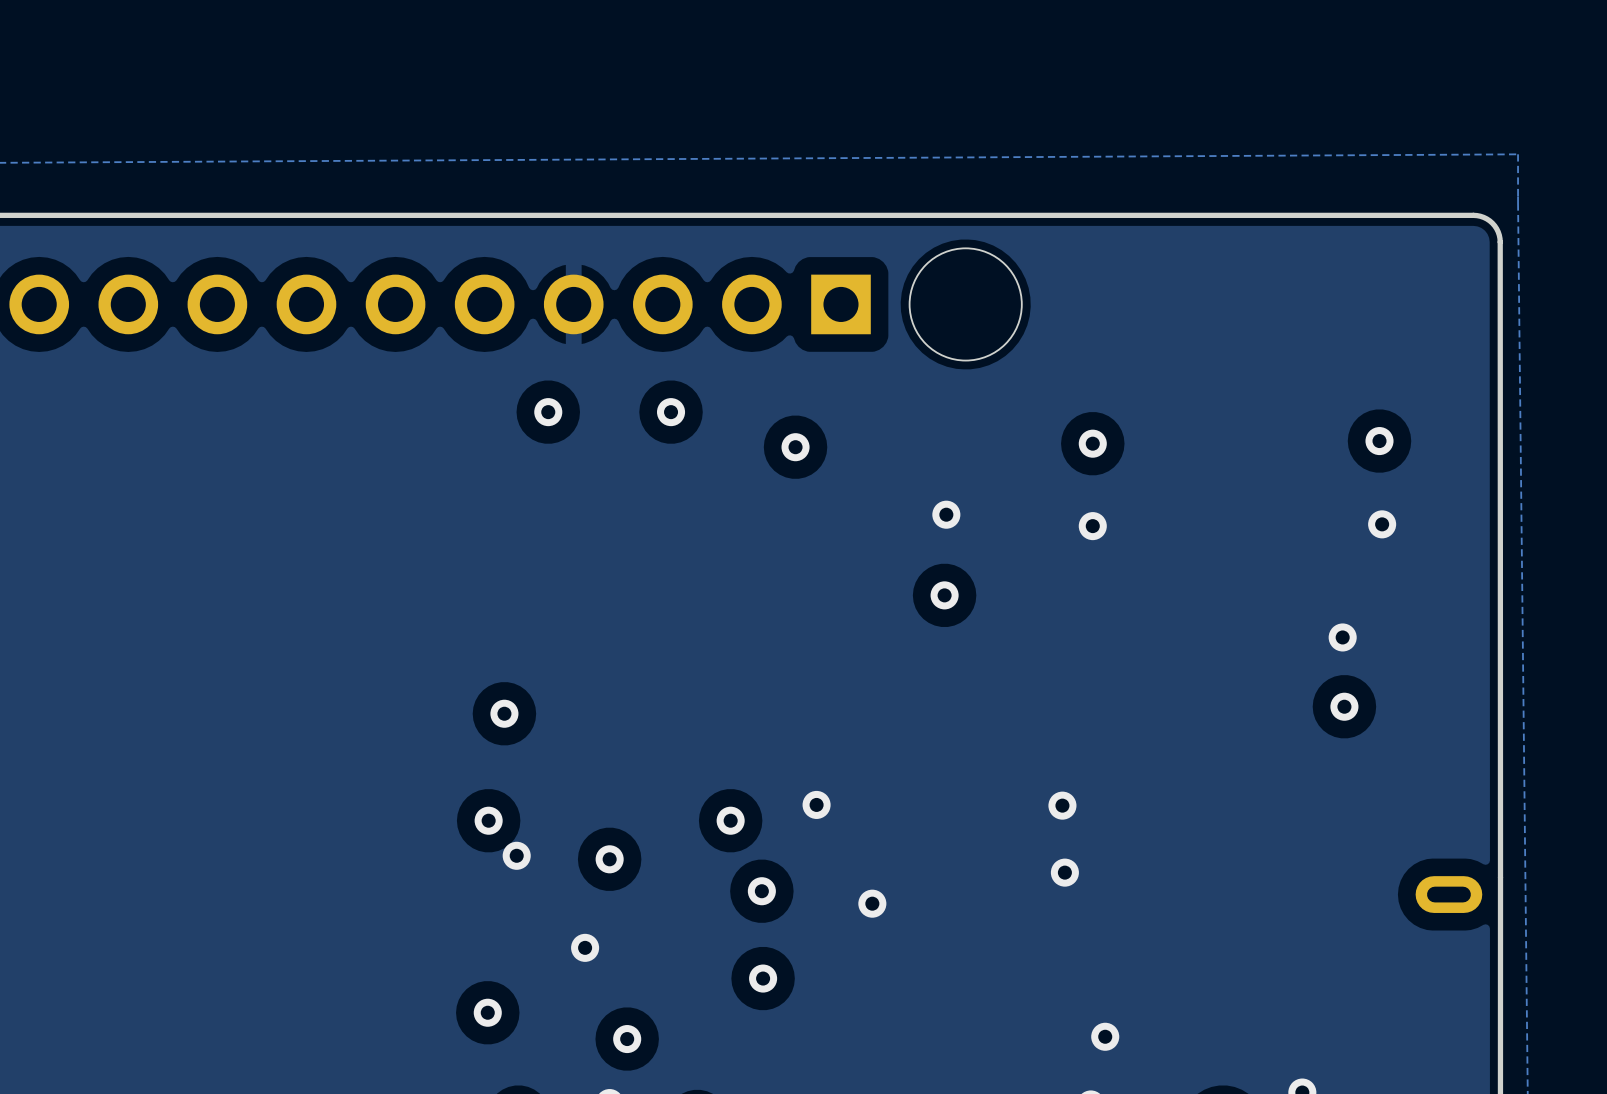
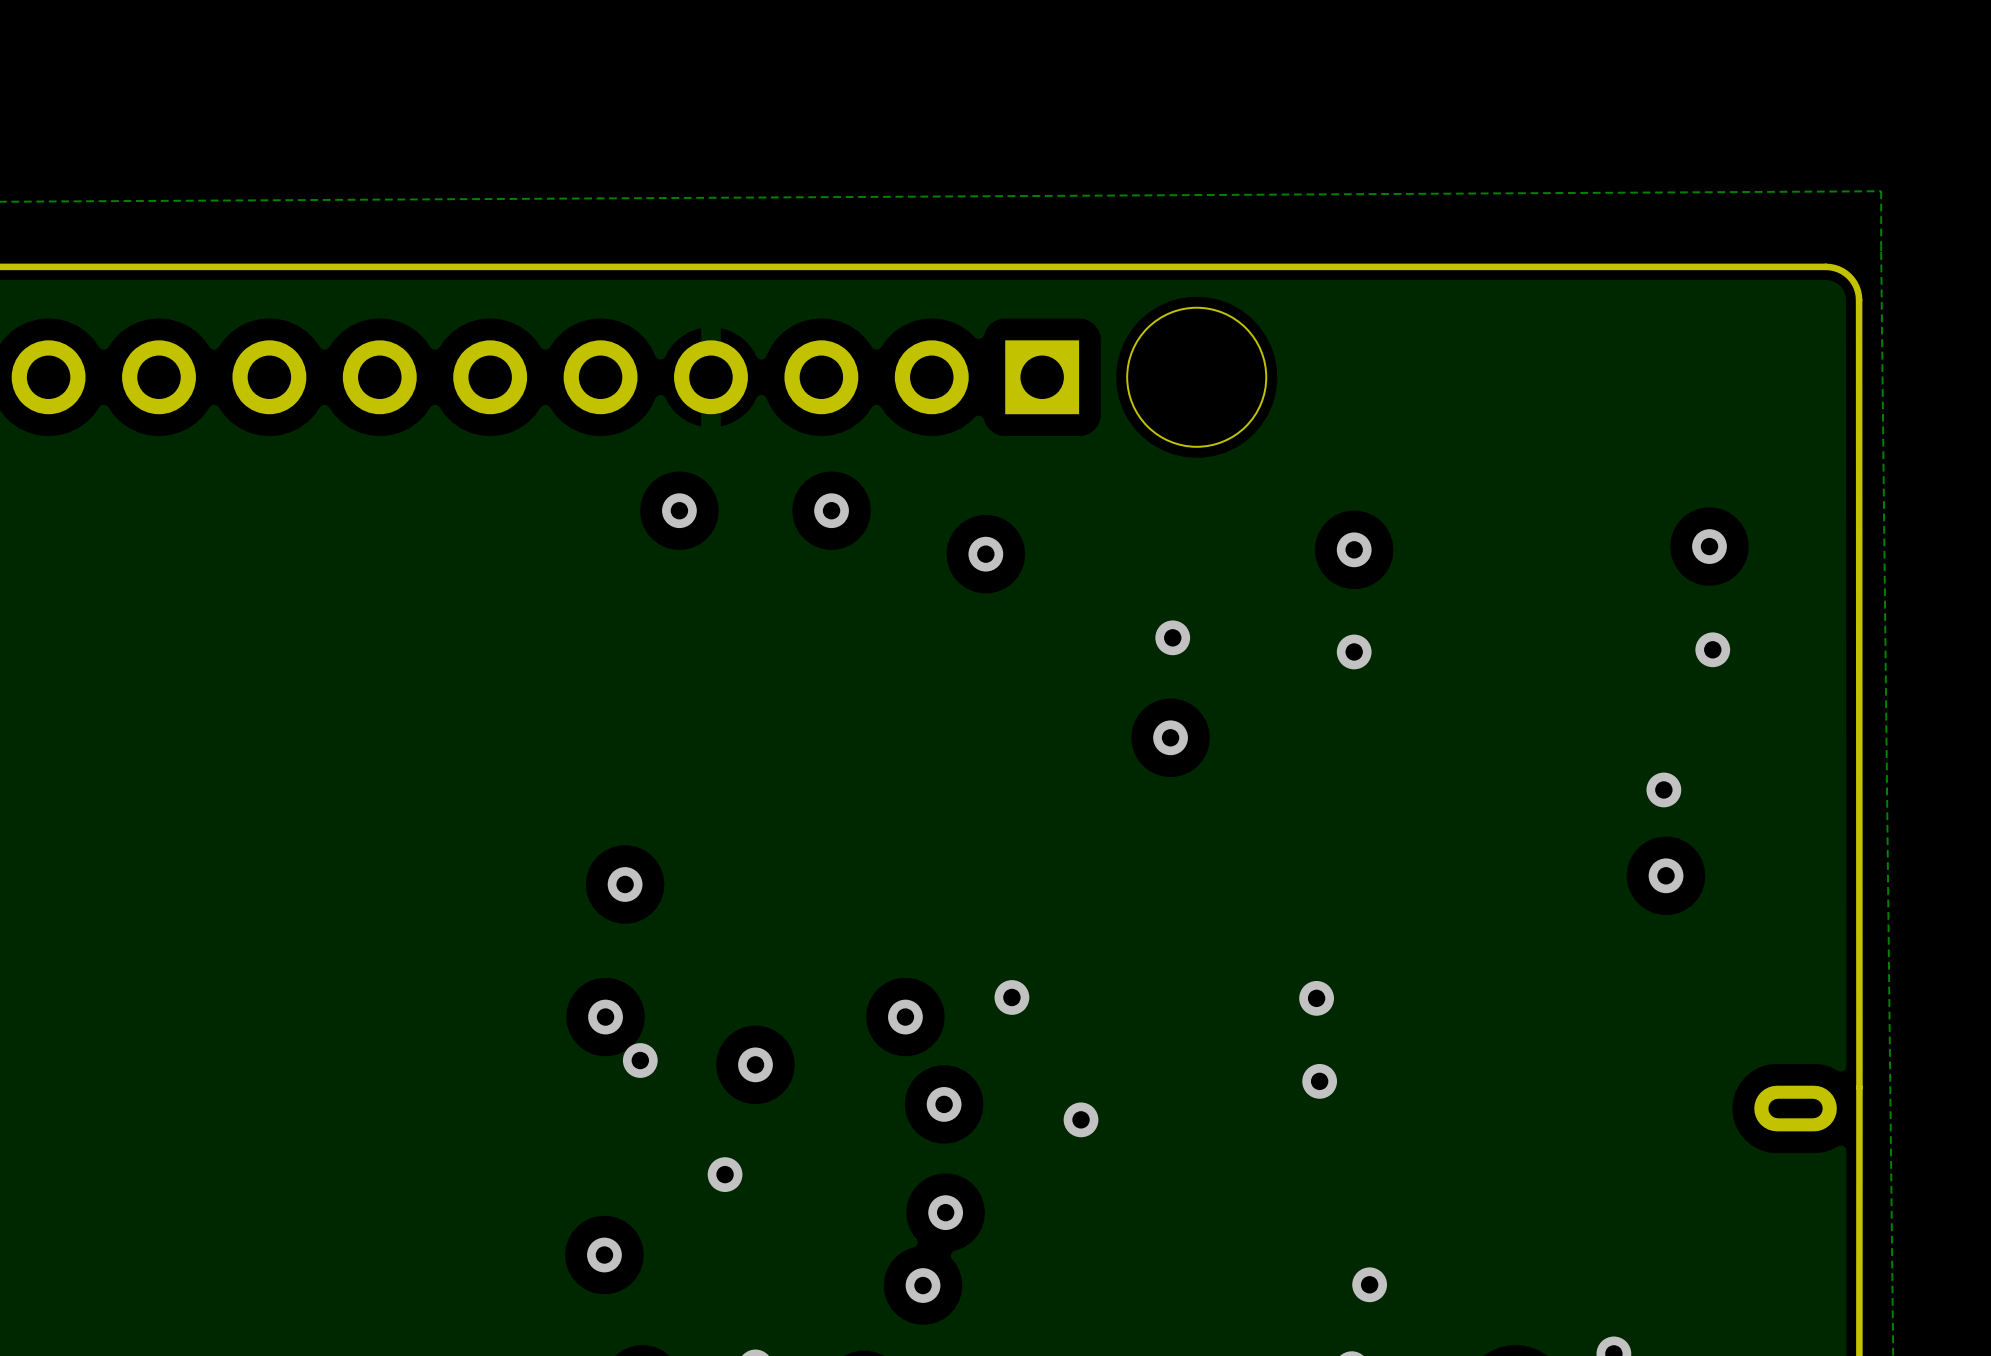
via position: (627, 1039) -> (923, 1285)

